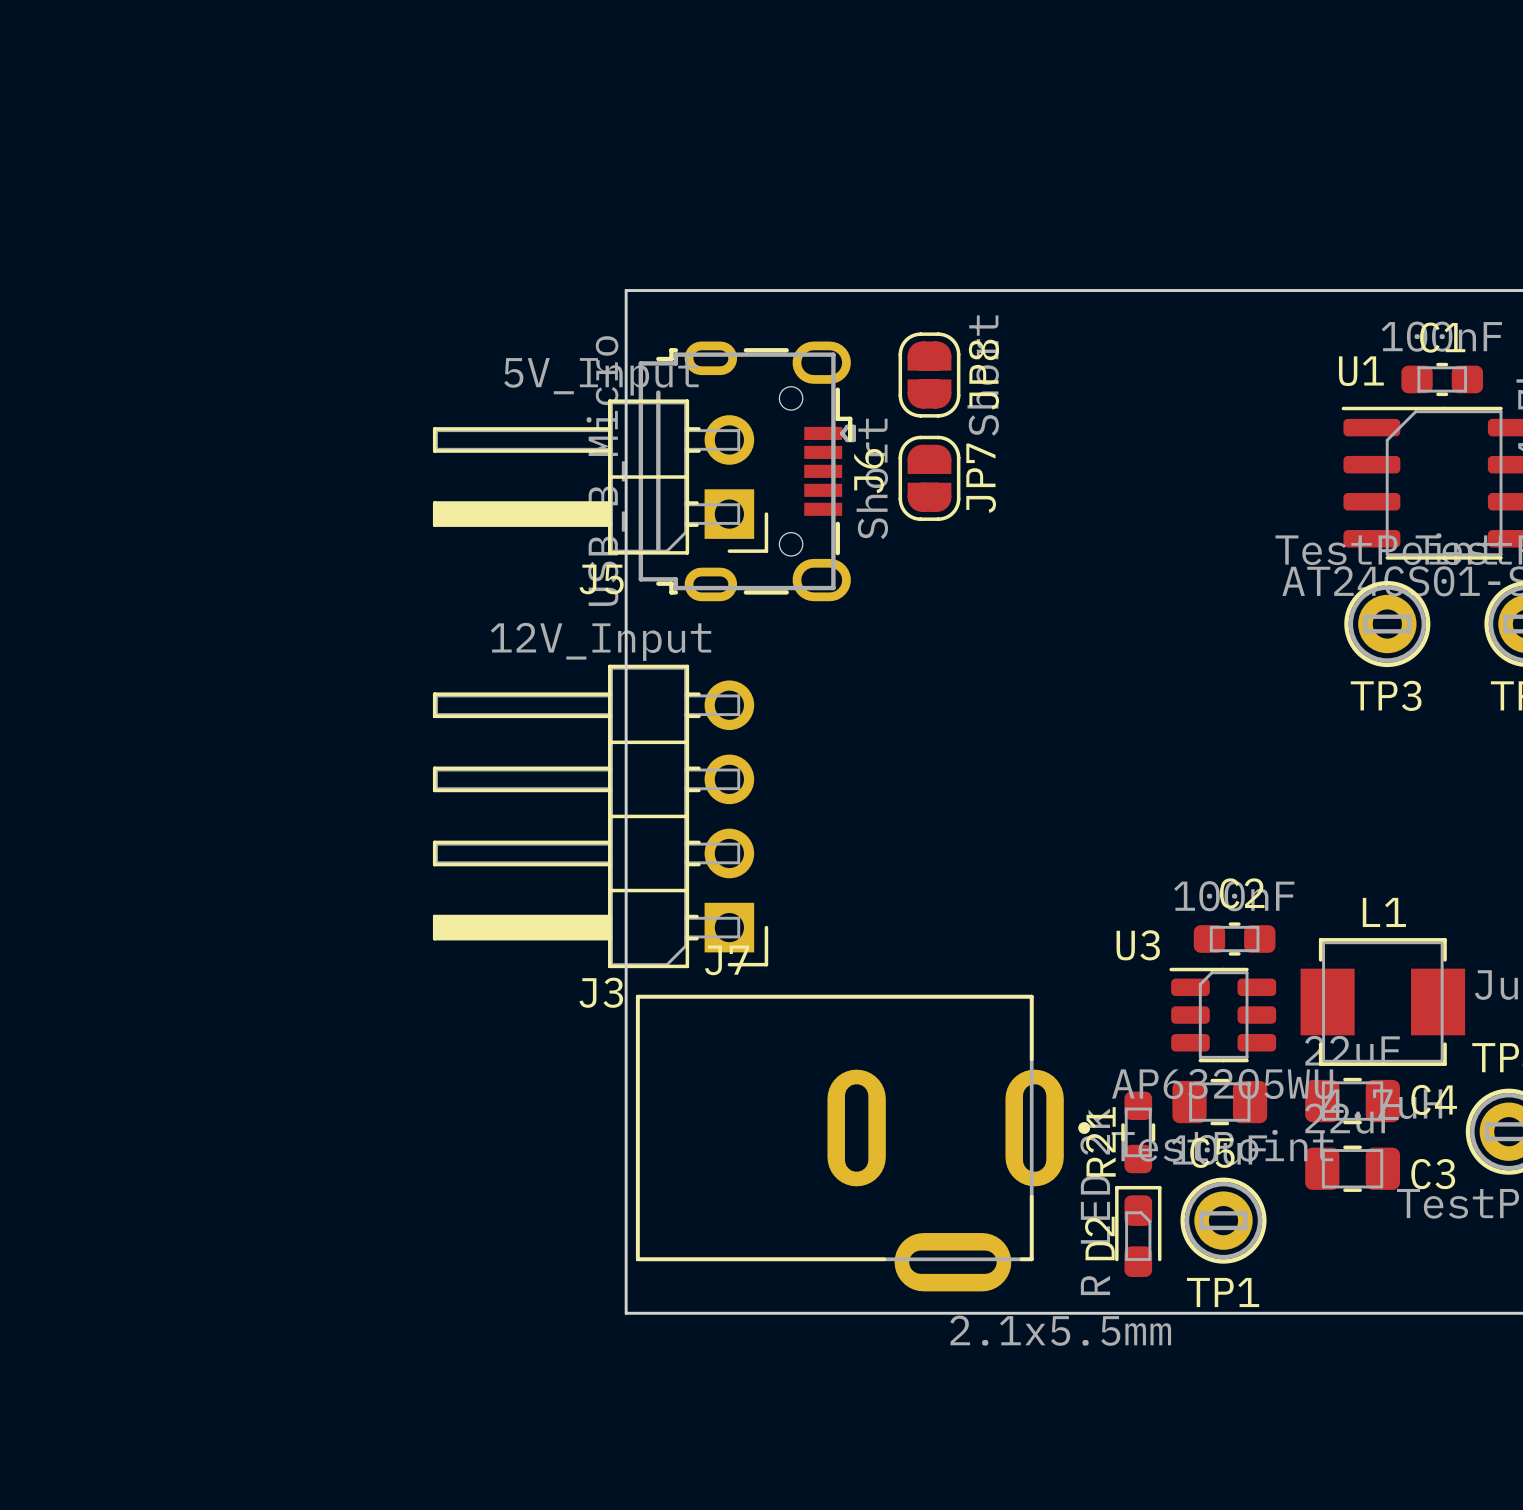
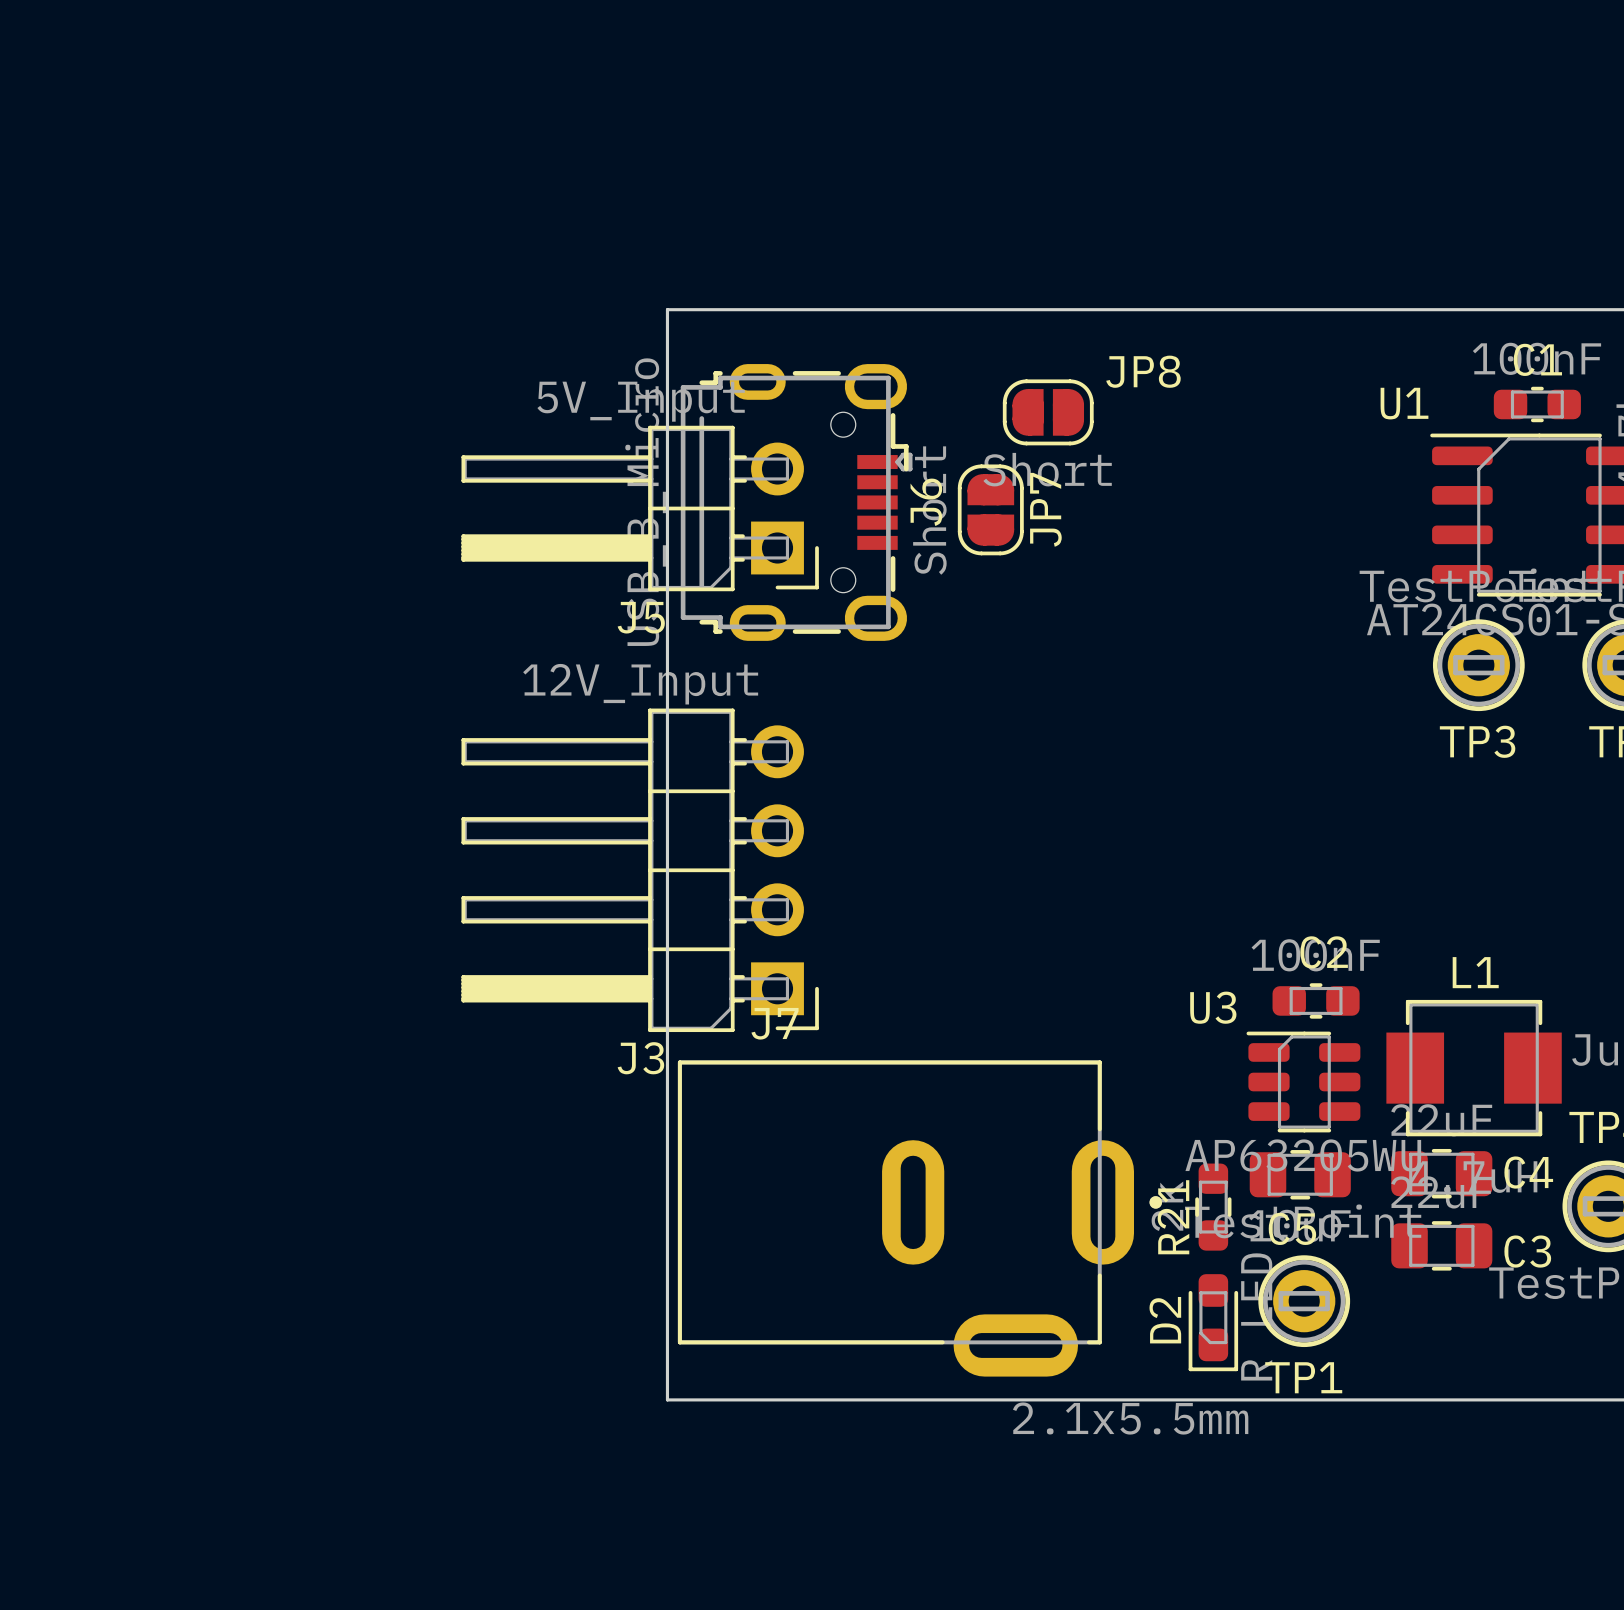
U1 name position: U1 (1361, 371) -> U1 (1404, 403)
JP8 rotation: 0° (929, 375) -> 90° clockwise (1048, 412)
JP8 position: (929, 375) -> (1048, 412)
D2 rotation: 0° (1138, 1231) -> 180° (1213, 1322)

